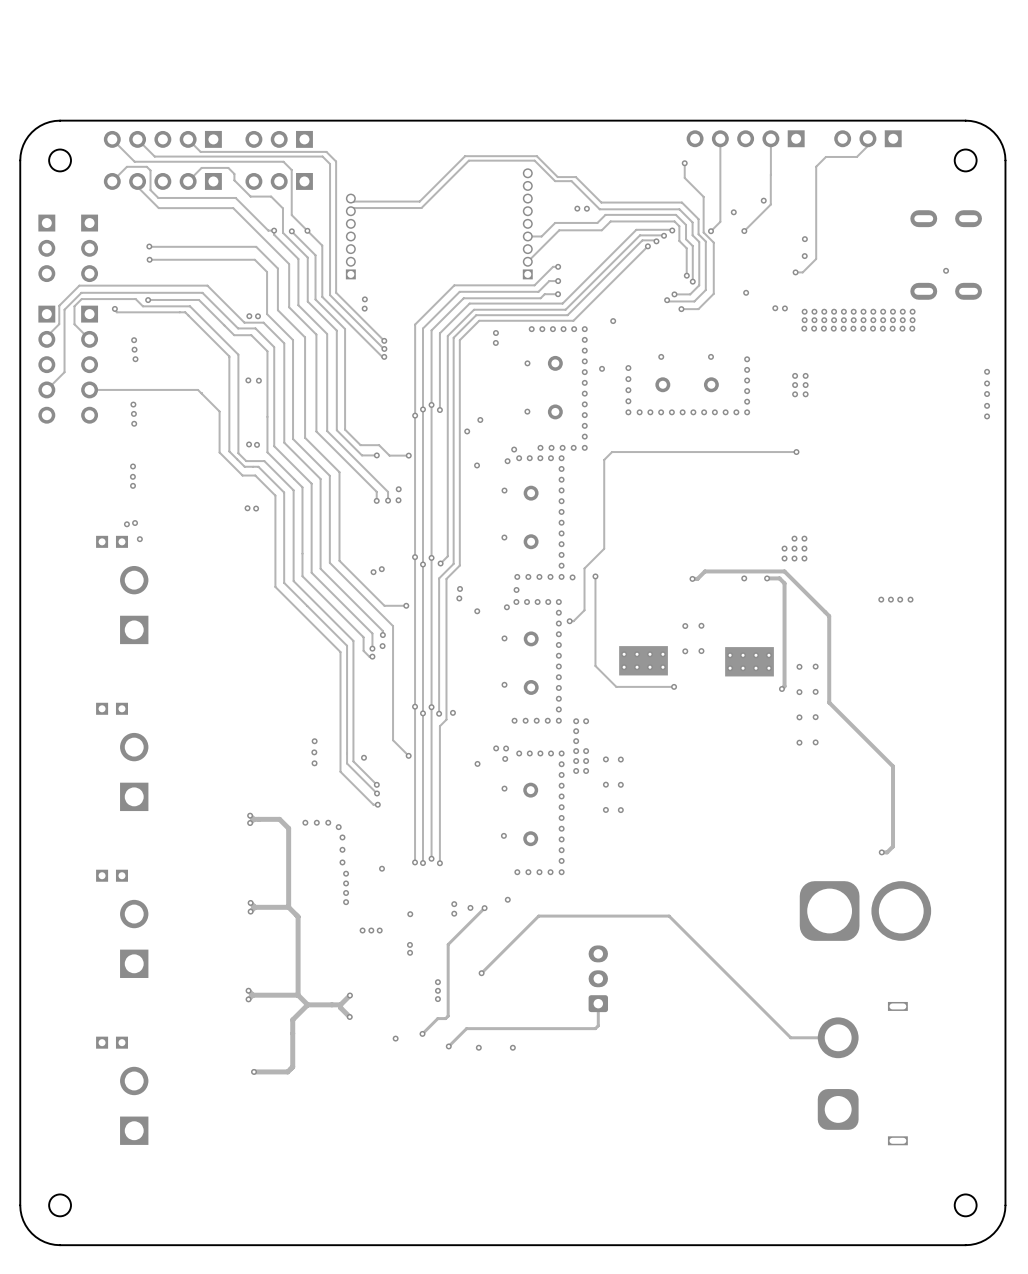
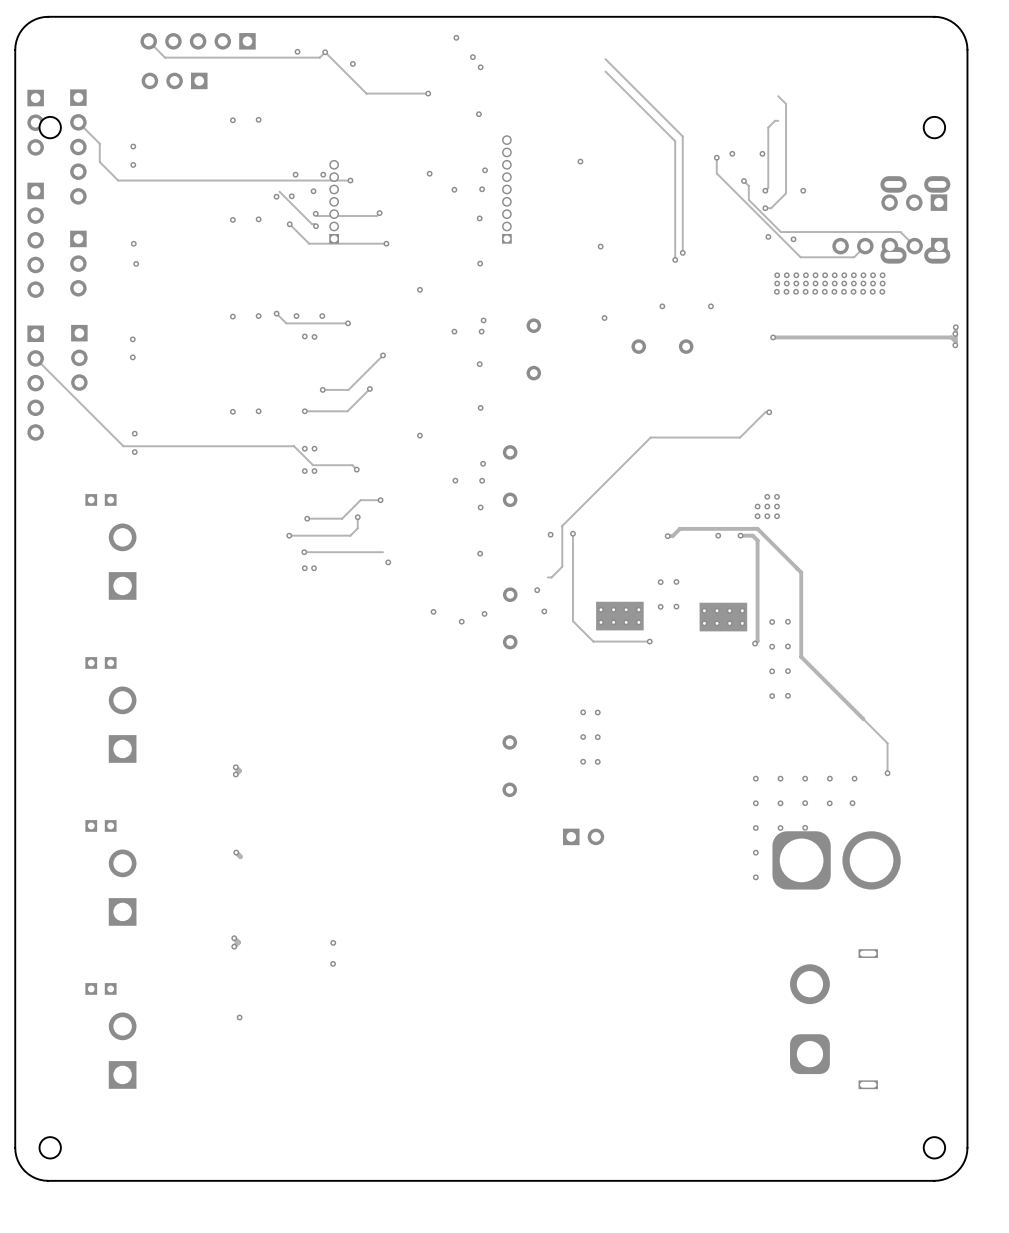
via: none -> (456, 37)
track: none -> (148, 41) (165, 57) (319, 57) (325, 52) (366, 93) (428, 93)
part: none -> (198, 41)
via: none -> (297, 51)
via: none -> (325, 52)
via: none -> (472, 57)
track: none -> (605, 59) (682, 136) (682, 252)
via: none -> (352, 63)
via: none -> (480, 67)
track: none -> (605, 71) (675, 141) (675, 259)
part: none -> (174, 80)
board edge: (965, 120) (60, 120) (40, 125) (28, 136) (21, 150) (20, 160) (20, 1205) (23, 1220) (35, 1236) (44, 1242) (60, 1245) (965, 1245) (985, 1239) (997, 1229) (1002, 1220) (1005, 1205) (1005, 160) (1002, 145) (993, 132) (980, 123) (965, 120) -> (934, 16) (947, 19) (957, 26) (964, 37) (967, 49) (967, 1147) (966, 1156) (960, 1167) (947, 1178) (934, 1180) (48, 1180) (35, 1178) (28, 1174) (17, 1160) (15, 1147) (15, 49) (16, 41) (22, 29) (35, 19) (48, 16) (934, 16)
via: none -> (428, 93)
track: none -> (778, 96) (786, 103) (786, 193) (771, 208) (765, 208)
track: (720, 138) (720, 221) (711, 231) -> none
part position: (745, 138) -> (889, 246)
track: (770, 138) (770, 174) -> none
track: (867, 138) (867, 145) (856, 156) (825, 156) (816, 166) (816, 258) (802, 272) (795, 272) -> none
part position: (867, 138) -> (914, 202)
track: (112, 139) (134, 161) (283, 161) (291, 170) (291, 215) (322, 245) (322, 296) (384, 356) -> none
track: (137, 139) (154, 156) (322, 156) (330, 164) (330, 295) (384, 348) -> none
part: (162, 139) -> none
track: (188, 139) (200, 151) (326, 151) (336, 161) (336, 292) (384, 340) -> none
part: (279, 139) -> none
via: none -> (478, 114)
via: none -> (232, 120)
via: none -> (258, 119)
track: none -> (778, 120) (775, 120) (768, 127) (768, 187) (765, 190)
part: none -> (35, 122)
track: none -> (78, 122) (99, 143) (99, 162) (118, 180) (350, 180)
track: (684, 163) (684, 177) (703, 196) (703, 232) (713, 242) (713, 293) (698, 309) (681, 309) -> none
via: (684, 163) -> none
track: (770, 174) (770, 204) (744, 231) -> none
via: none -> (133, 146)
part: none -> (78, 147)
track: (112, 181) (126, 166) (146, 166) (150, 170) (150, 190) (158, 197) (235, 197) (268, 230) (274, 230) (274, 234) (298, 258) (298, 305) (327, 334) (327, 431) (388, 491) (388, 500) -> none
track: (137, 181) (137, 186) (158, 208) (233, 208) (289, 264) (289, 307) (316, 334) (316, 431) (376, 491) (376, 500) -> none
part: (162, 181) -> none
track: (188, 181) (201, 167) (228, 167) (234, 173) (234, 180) (250, 196) (271, 196) (282, 208) (282, 232) (307, 257) (307, 301) (336, 330) (336, 430) (361, 455) (376, 455) -> none
part: (279, 181) -> none
via: none -> (732, 153)
via: none -> (762, 153)
track: none -> (716, 157) (716, 173) (800, 257) (854, 257) (865, 246)
via: none -> (716, 157)
via: none -> (580, 161)
via: none -> (133, 164)
track: (350, 198) (353, 201) (419, 201) (465, 156) (536, 156) (557, 177) (575, 177) (601, 202) (681, 202) (698, 219) (698, 234) (705, 241) (705, 290) (694, 301) (667, 300) -> none
via: (763, 200) -> none
via: none -> (485, 170)
via: none -> (429, 173)
via: none -> (295, 174)
via: none -> (323, 174)
via: (577, 208) -> none
via: (586, 208) -> none
track: (350, 211) (354, 208) (421, 208) (468, 160) (534, 160) (555, 181) (571, 181) (599, 209) (679, 209) (692, 222) (692, 235) (699, 241) (699, 285) (690, 294) (674, 294) -> none
via: (733, 212) -> none
via: none -> (350, 180)
track: none -> (743, 181) (748, 185) (748, 199) (780, 232) (900, 232) (914, 246)
via: none -> (743, 181)
via: none -> (482, 189)
via: none -> (454, 189)
via: none -> (313, 191)
via: none -> (765, 190)
via: none -> (803, 190)
track: none -> (279, 191) (315, 226)
via: (274, 230) -> none
track: (672, 230) (636, 229) (562, 303) (469, 303) (439, 333) (439, 410) -> none
via: (672, 230) -> none
track: (291, 231) (315, 255) (315, 299) (345, 329) (345, 429) (360, 445) (379, 445) (389, 455) (408, 455) -> none
via: (711, 231) -> none
via: (744, 231) -> none
track: (664, 235) (639, 235) (565, 309) (474, 309) (447, 336) (447, 556) (440, 563) -> none
via: (664, 235) -> none
track: (527, 236) (541, 236) (555, 222) (597, 222) (605, 214) (675, 214) (686, 224) (686, 239) (692, 246) (692, 281) -> none
via: (804, 239) -> none
track: (656, 241) (642, 240) (567, 315) (476, 315) (453, 337) (453, 563) (439, 578) (439, 713) -> none
via: (656, 241) -> none
via: none -> (765, 208)
track: (149, 246) (256, 246) (277, 268) (277, 310) (305, 337) (305, 437) (339, 472) (339, 560) (384, 605) (406, 605) -> none
via: (149, 246) -> none
track: (647, 246) (573, 320) (479, 320) (459, 340) (459, 565) (446, 578) (446, 719) (439, 726) (439, 863) -> none
via: (647, 246) -> none
part: (46, 248) -> none
part: (89, 248) -> none
via: none -> (315, 213)
track: none -> (379, 213) (376, 216) (317, 216) (315, 213)
via: none -> (379, 213)
via: none -> (479, 218)
via: none -> (232, 219)
via: none -> (258, 219)
via: (804, 256) -> none
track: (149, 259) (254, 259) (267, 272) (267, 314) (293, 340) (293, 439) (329, 475) (329, 562) (393, 626) (393, 740) (408, 755) -> none
via: (149, 259) -> none
track: none -> (289, 224) (309, 243) (386, 243)
via: none -> (289, 224)
via: none -> (315, 226)
track: (527, 261) (559, 230) (601, 230) (610, 221) (674, 221) (679, 226) (679, 240) (686, 248) (686, 275) -> none
track: (558, 266) (553, 266) (534, 285) (454, 285) (415, 324) (415, 415) -> none
via: (558, 266) -> none
via: (946, 270) -> none
via: none -> (793, 239)
part: none -> (35, 240)
via: (686, 275) -> none
via: none -> (133, 243)
via: none -> (386, 243)
track: (558, 281) (549, 281) (538, 291) (459, 291) (423, 328) (423, 863) -> none
via: (558, 281) -> none
via: (692, 281) -> none
via: none -> (600, 246)
via: none -> (682, 252)
via: (746, 292) -> none
track: (558, 294) (544, 294) (540, 298) (463, 298) (431, 330) (431, 858) -> none
via: (558, 294) -> none
via: (674, 294) -> none
via: none -> (675, 259)
part: none -> (78, 263)
track: (148, 299) (198, 299) (234, 335) (251, 335) (267, 351) (267, 452) (302, 487) (302, 576) (363, 637) (363, 650) (369, 656) (372, 656) -> none
via: (364, 299) -> none
via: none -> (480, 263)
via: (667, 300) -> none
track: (114, 308) (116, 312) (185, 312) (229, 356) (229, 451) (244, 466) (258, 466) (284, 492) (284, 582) (347, 645) (347, 763) (377, 793) -> none
via: (114, 308) -> none
via: (364, 308) -> none
via: (775, 308) -> none
via: (784, 308) -> none
via: (681, 309) -> none
via: (249, 316) -> none
via: (258, 316) -> none
via: (613, 321) -> none
via: none -> (419, 289)
via: (531, 329) -> none
via: (542, 329) -> none
via: (552, 329) -> none
via: (563, 329) -> none
via: (574, 329) -> none
via: (584, 329) -> none
via: (495, 333) -> none
track: (46, 339) (46, 336) (59, 324) (59, 305) (79, 285) (207, 285) (244, 322) (263, 322) (284, 343) (284, 442) (320, 479) (320, 568) (382, 631) (382, 635) -> none
track: (89, 339) (74, 324) (74, 306) (81, 299) (135, 299) (142, 306) (190, 306) (238, 354) (238, 453) (246, 461) (264, 461) (293, 490) (293, 581) (353, 640) (353, 761) (376, 784) -> none
via: (584, 339) -> none
via: (134, 340) -> none
via: (384, 340) -> none
via: (495, 342) -> none
via: none -> (662, 306)
via: none -> (710, 306)
via: (384, 348) -> none
via: (134, 349) -> none
via: (584, 350) -> none
track: none -> (276, 313) (286, 323) (348, 323)
via: none -> (276, 313)
via: none -> (258, 316)
via: none -> (296, 316)
via: none -> (322, 316)
via: none -> (232, 316)
via: none -> (604, 318)
via: (384, 356) -> none
via: (661, 356) -> none
via: (711, 356) -> none
via: none -> (483, 320)
via: (135, 359) -> none
via: (747, 359) -> none
via: none -> (348, 323)
via: (584, 361) -> none
via: (527, 363) -> none
part: (46, 364) -> none
part: (89, 364) -> none
track: none -> (955, 327) (955, 341) (951, 337) (773, 337)
via: none -> (955, 327)
via: (602, 368) -> none
via: (628, 368) -> none
via: none -> (454, 331)
via: none -> (481, 331)
via: (747, 369) -> none
via: (584, 372) -> none
via: none -> (304, 336)
via: none -> (314, 336)
via: (795, 375) -> none
via: none -> (773, 337)
via: (805, 375) -> none
via: none -> (132, 339)
via: (628, 379) -> none
via: (248, 380) -> none
via: (258, 380) -> none
via: (747, 380) -> none
via: (584, 382) -> none
via: (795, 385) -> none
via: (805, 385) -> none
track: (46, 389) (64, 372) (64, 309) (81, 292) (202, 292) (238, 328) (255, 328) (274, 347) (274, 446) (311, 483) (311, 572) (372, 633) (372, 648) -> none
track: (89, 389) (197, 389) (219, 411) (219, 452) (242, 475) (255, 475) (275, 495) (275, 586) (340, 652) (340, 771) (373, 804) (377, 804) -> none
via: (628, 390) -> none
via: (747, 391) -> none
track: none -> (383, 355) (348, 389) (322, 389)
via: none -> (383, 355)
via: (584, 393) -> none
via: (795, 394) -> none
via: (805, 394) -> none
via: (987, 394) -> none
via: none -> (132, 357)
track: none -> (35, 358) (123, 446) (294, 446) (313, 465) (352, 465) (356, 469)
part: none -> (79, 357)
via: (628, 401) -> none
via: (747, 401) -> none
via: none -> (479, 364)
via: (133, 404) -> none
via: (431, 404) -> none
via: (584, 404) -> none
via: (987, 405) -> none
via: (423, 409) -> none
via: (439, 410) -> none
via: (527, 411) -> none
via: (628, 412) -> none
via: (639, 412) -> none
via: (650, 412) -> none
via: (661, 412) -> none
via: (671, 412) -> none
via: (682, 412) -> none
via: (693, 412) -> none
via: (704, 412) -> none
via: (714, 412) -> none
via: (725, 412) -> none
via: (736, 412) -> none
via: (747, 412) -> none
via: (133, 413) -> none
track: (415, 415) (415, 862) -> none
via: (415, 415) -> none
via: (584, 415) -> none
via: (987, 416) -> none
via: (480, 419) -> none
part: none -> (35, 383)
via: (134, 423) -> none
via: (584, 425) -> none
track: none -> (369, 388) (347, 411) (304, 411)
via: none -> (369, 388)
via: none -> (322, 389)
via: (467, 431) -> none
via: (584, 436) -> none
via: (249, 444) -> none
via: (257, 444) -> none
via: none -> (480, 407)
via: (540, 447) -> none
via: (551, 447) -> none
via: (562, 447) -> none
via: (573, 447) -> none
via: (584, 447) -> none
via: (514, 449) -> none
via: none -> (232, 411)
via: none -> (258, 411)
via: none -> (304, 411)
track: (792, 452) (612, 452) (604, 459) (604, 548) -> (765, 412) (740, 437) (650, 437) (581, 506)
via: (376, 455) -> none
via: (408, 455) -> none
via: (519, 458) -> none
via: (529, 458) -> none
via: (540, 458) -> none
via: (550, 458) -> none
via: (561, 458) -> none
via: (507, 461) -> none
via: (477, 465) -> none
via: (133, 466) -> none
via: (561, 468) -> none
via: none -> (134, 433)
via: none -> (419, 435)
via: (132, 476) -> none
via: (561, 479) -> none
via: (133, 485) -> none
via: none -> (304, 448)
via: none -> (314, 448)
via: (398, 489) -> none
via position: (504, 490) -> (483, 463)
via: (561, 490) -> none
via: none -> (134, 452)
via: (376, 500) -> none
via: (388, 500) -> none
via: (398, 500) -> none
via: (561, 501) -> none
via: (247, 508) -> none
via: (256, 508) -> none
via: none -> (356, 469)
via: (561, 511) -> none
via: none -> (304, 471)
via: none -> (314, 471)
via: none -> (455, 480)
via: none -> (482, 480)
via: (561, 522) -> none
via: (135, 523) -> none
via: (126, 524) -> none
via: (561, 533) -> none
via: (504, 537) -> none
via: (139, 539) -> none
track: none -> (380, 500) (360, 500) (342, 518) (307, 518)
via: none -> (380, 500)
via: (561, 544) -> none
via: none -> (480, 507)
via: (561, 554) -> none
via: (415, 557) -> none
via: (431, 557) -> none
track: none -> (357, 516) (357, 528) (350, 535) (289, 535)
via: none -> (357, 517)
via: none -> (307, 518)
via: (440, 563) -> none
via: (423, 564) -> none
via: (561, 565) -> none
via: (381, 569) -> none
via: (373, 572) -> none
via: (517, 576) -> none
via: (528, 576) -> none
via: (539, 576) -> none
via: (550, 576) -> none
via: (561, 576) -> none
via: none -> (289, 535)
via: (460, 588) -> none
via: (516, 589) -> none
via: none -> (304, 552)
track: none -> (383, 552) (304, 552)
via: none -> (480, 553)
via: (459, 598) -> none
via: (881, 599) -> none
via: (890, 599) -> none
via: (900, 599) -> none
via: (910, 599) -> none
via: (516, 602) -> none
via: (527, 602) -> none
via: (537, 602) -> none
via: (548, 602) -> none
via: (558, 602) -> none
via: (506, 607) -> none
via: none -> (304, 568)
via: none -> (314, 568)
via: (477, 611) -> none
via: (558, 612) -> none
via: (569, 621) -> none
via: (558, 623) -> none
via: (382, 635) -> none
via: (504, 638) -> none
via: (558, 645) -> none
via: (382, 646) -> none
via: (372, 648) -> none
via: (558, 655) -> none
via: (372, 656) -> none
via: none -> (433, 611)
via: none -> (544, 611)
via: none -> (484, 613)
via: none -> (461, 621)
via: (558, 666) -> none
via: (558, 677) -> none
via: (504, 684) -> none
via: (558, 687) -> none
via: (558, 698) -> none
via: (415, 706) -> none
via: (431, 707) -> none
via: (558, 709) -> none
via: (452, 712) -> none
via: (423, 713) -> none
via: (439, 713) -> none
via: (514, 720) -> none
via: (525, 720) -> none
via: (536, 720) -> none
via: (547, 720) -> none
via: (558, 720) -> none
via: (576, 721) -> none
via: (586, 721) -> none
via: (576, 731) -> none
via: (314, 741) -> none
via: (576, 741) -> none
via: (496, 748) -> none
via: (506, 748) -> none
via: (576, 751) -> none
via: (586, 751) -> none
via: (314, 752) -> none
via: (519, 753) -> none
via: (529, 753) -> none
via: (540, 753) -> none
via: (551, 753) -> none
via: (561, 753) -> none
via: (408, 755) -> none
via: (363, 757) -> none
via: (505, 758) -> none
via: (576, 761) -> none
via: (586, 761) -> none
via: (314, 763) -> none
via: (477, 763) -> none
via: (561, 764) -> none
track: (893, 766) (893, 846) (887, 852) (881, 852) -> (863, 719) (887, 743) (887, 773)
via: (576, 770) -> none
via: (586, 770) -> none
via: (561, 774) -> none
via: (376, 784) -> none
via: (561, 785) -> none
via: (504, 788) -> none
via: (377, 793) -> none
via: (561, 796) -> none
via: (377, 804) -> none
via: (561, 807) -> none
via: (561, 817) -> none
track: (253, 819) (279, 819) (288, 828) (288, 907) -> none
via: none -> (887, 773)
via: (305, 822) -> none
via: (316, 822) -> none
via: (328, 822) -> none
via: (338, 827) -> none
via: none -> (755, 778)
via: none -> (780, 778)
via: none -> (805, 778)
via: none -> (829, 778)
via: none -> (854, 778)
via: (561, 828) -> none
via: (503, 835) -> none
via: (342, 837) -> none
via: (561, 839) -> none
via: (342, 849) -> none
via: (561, 850) -> none
via: none -> (755, 803)
via: none -> (780, 803)
via: none -> (805, 803)
via: none -> (829, 803)
via: (431, 858) -> none
via: (561, 860) -> none
via: (342, 862) -> none
via: (415, 862) -> none
via: (423, 863) -> none
via: (439, 863) -> none
via: (382, 868) -> none
via: (517, 872) -> none
via: (528, 872) -> none
via: (539, 872) -> none
via: (550, 872) -> none
via: (561, 872) -> none
via: (346, 873) -> none
via: none -> (755, 827)
via: none -> (780, 827)
via: none -> (805, 827)
via: (346, 883) -> none
part: none -> (583, 836)
via: (346, 892) -> none
via: (507, 899) -> none
via: (346, 902) -> none
via: none -> (755, 852)
via: (454, 904) -> none
track: (288, 907) (298, 916) (298, 995) -> none
track: (288, 907) (254, 907) (250, 911) -> none
via: (470, 907) -> none
track: (484, 908) (448, 944) (448, 1016) (445, 1018) (437, 1018) (422, 1033) -> none
via: (484, 908) -> none
via: (250, 911) -> none
via: (454, 913) -> none
via: (410, 914) -> none
via: none -> (755, 877)
via: (362, 930) -> none
via: (371, 930) -> none
via: (379, 930) -> none
via: (409, 944) -> none
via: (410, 952) -> none
track: (481, 973) (538, 916) (669, 916) (790, 1037) (838, 1037) -> none
via: (481, 973) -> none
part: (598, 978) -> none
via: (437, 982) -> none
via: (437, 990) -> none
track: (298, 995) (307, 1004) -> none
track: (298, 995) (254, 995) -> none
track: (349, 995) (340, 1004) -> none
via: (437, 999) -> none
track: (598, 1003) (598, 1025) (595, 1028) (466, 1028) (448, 1046) -> none
track: (307, 1004) (292, 1019) (292, 1066) (287, 1071) (253, 1071) -> none
track: (340, 1004) (340, 1007) (349, 1016) -> none
track: (340, 1004) (307, 1004) -> none
via: (422, 1033) -> none
via: (395, 1038) -> none
via: (448, 1046) -> none
via: (478, 1047) -> none
via: (512, 1047) -> none

